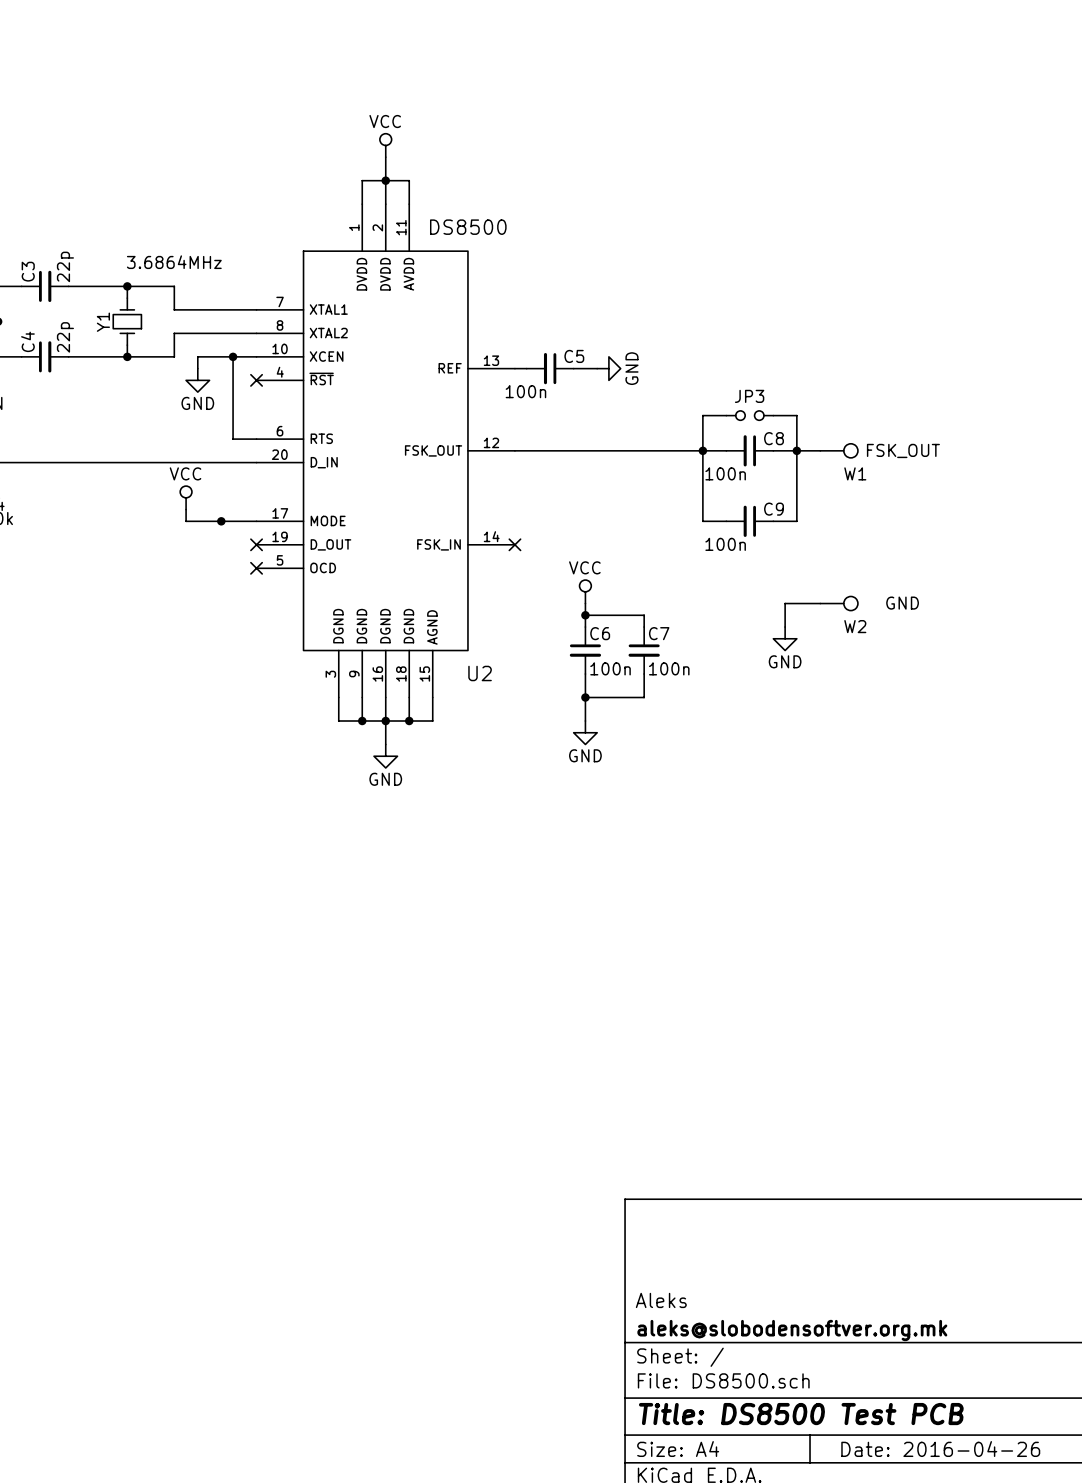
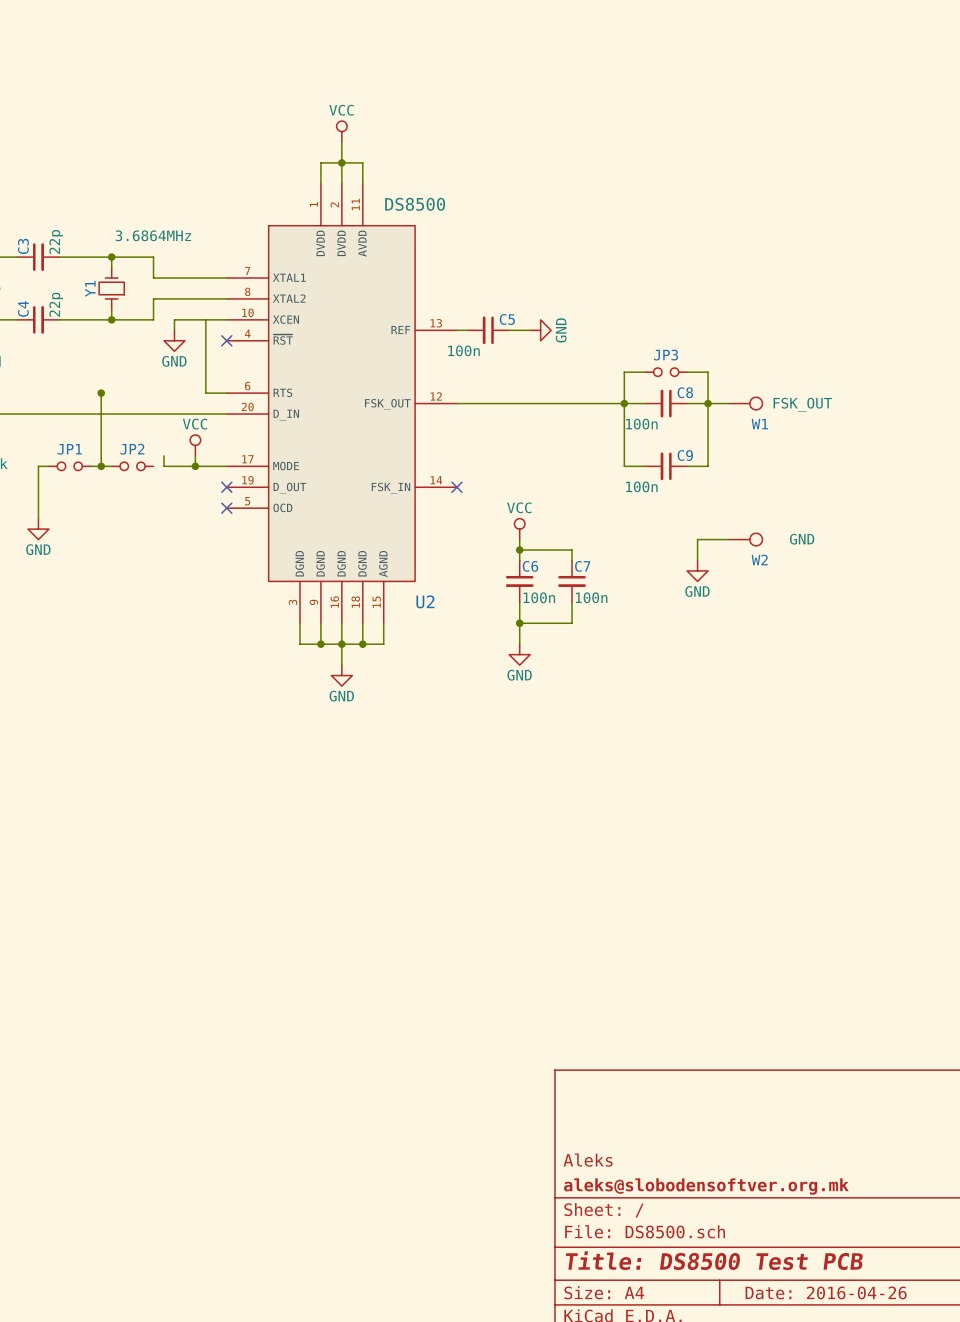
junction: (233, 356) -> none
wire: none -> (101, 393) (101, 466)
junction: none -> (101, 393)
power symbol position: VCC (186, 497) -> VCC (195, 445)
wire: none -> (195, 455) (195, 466)
wire: none -> (48, 466) (38, 466) (38, 518)
JP1: none -> (69, 466)
wire: none -> (90, 466) (111, 466)
junction: none -> (101, 466)
JP2: none -> (132, 466)
power symbol: none -> GND (38, 529)

